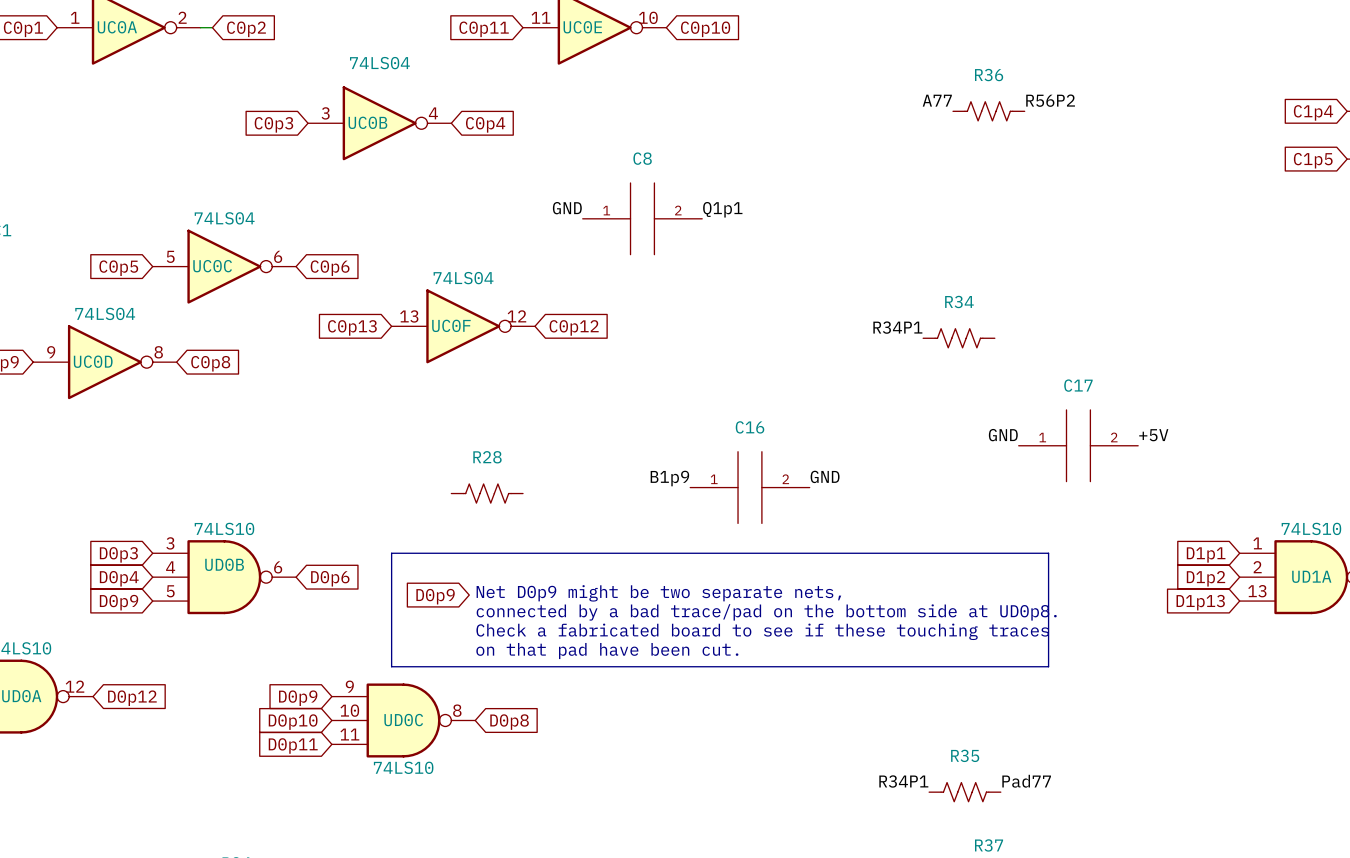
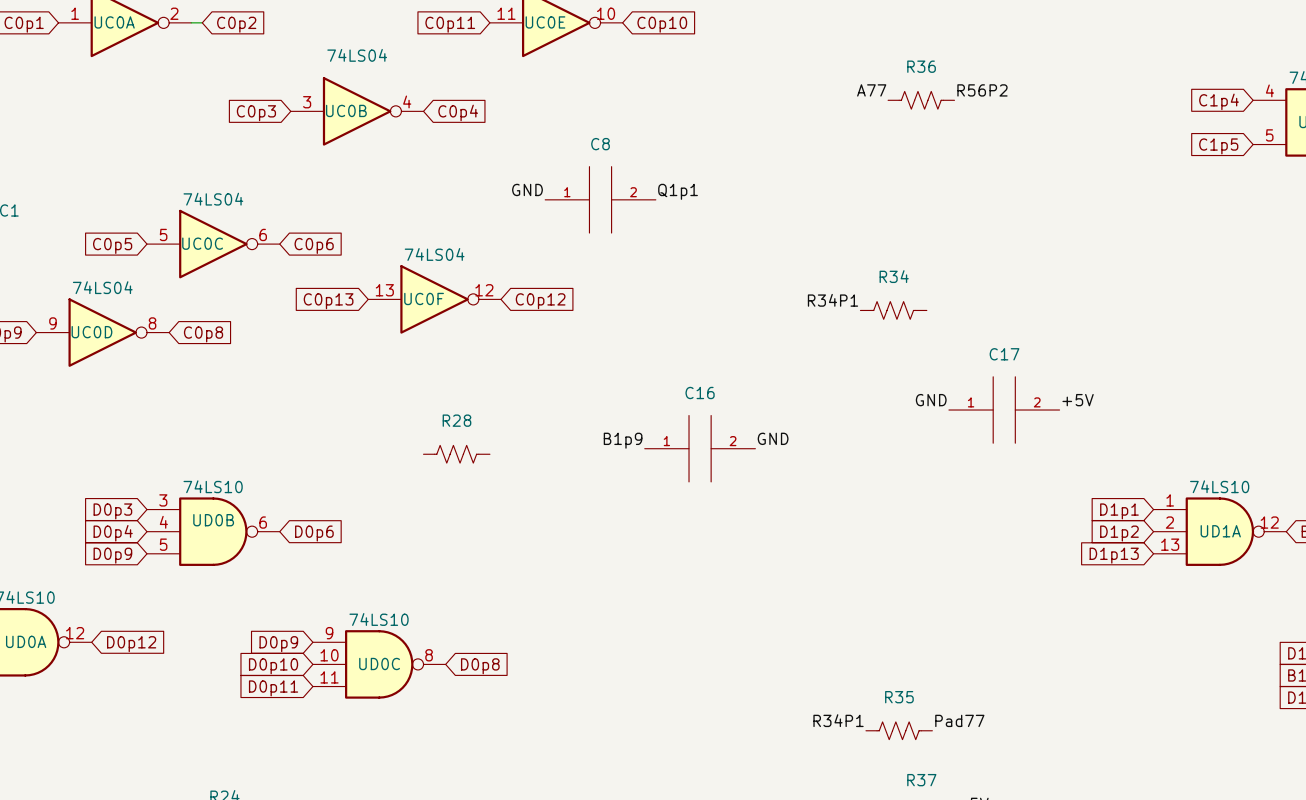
line: (391, 553) (1048, 553) (1048, 666) (391, 666) (391, 553) -> none
text: Net D0p9 might be two separate nets, (658, 593) -> none
global label: D0p9 (435, 596) -> none
text: connected by a bad trace/pad on the bottom side at UD0p8. (766, 612) -> none
text: Check a fabricated board to see if these touching traces (762, 631) -> none
text: on that pad have been cut. (607, 651) -> none
UD0C value position: 74LS10 (403, 767) -> 74LS10 (379, 619)

